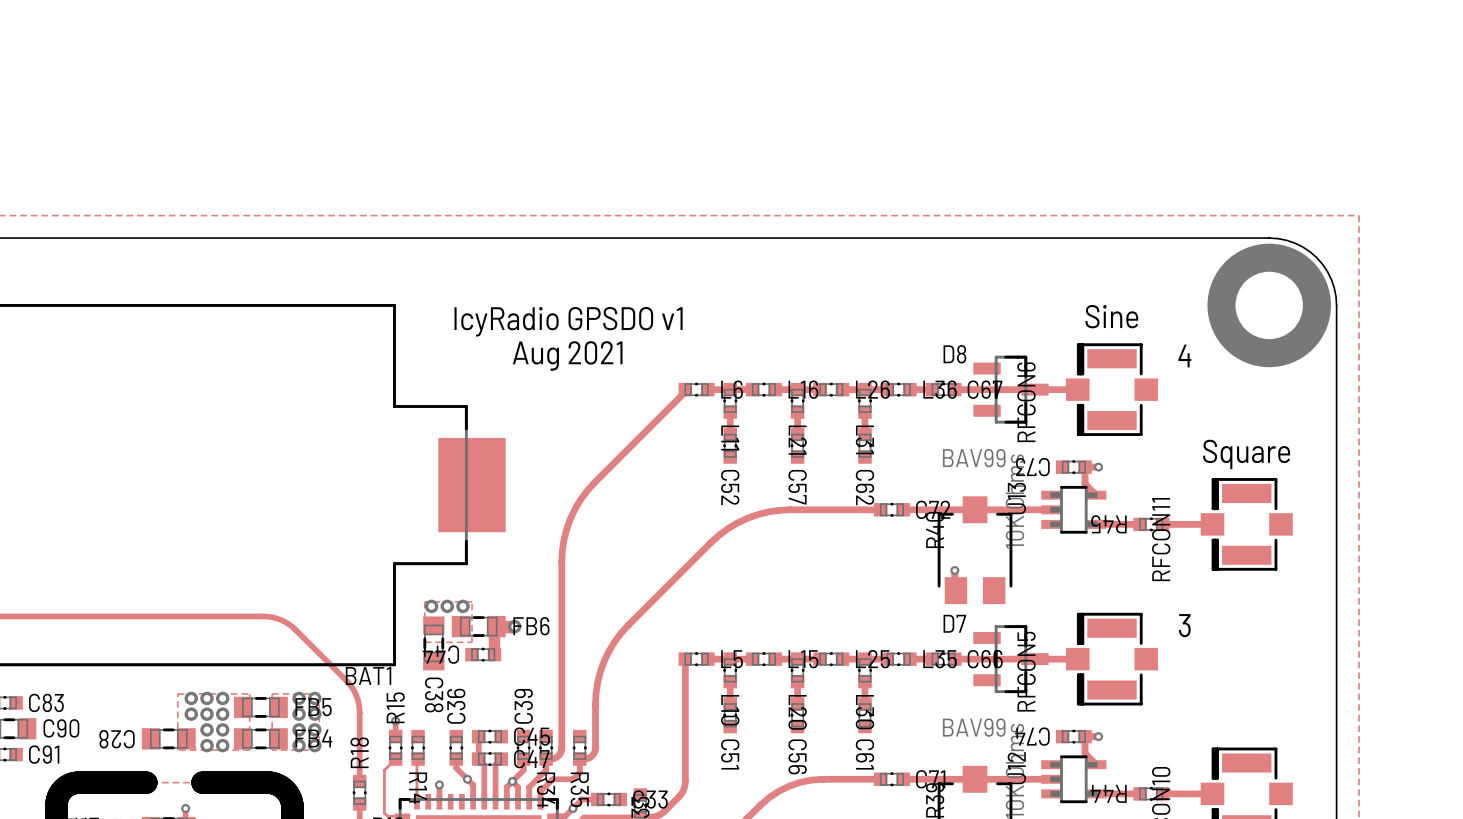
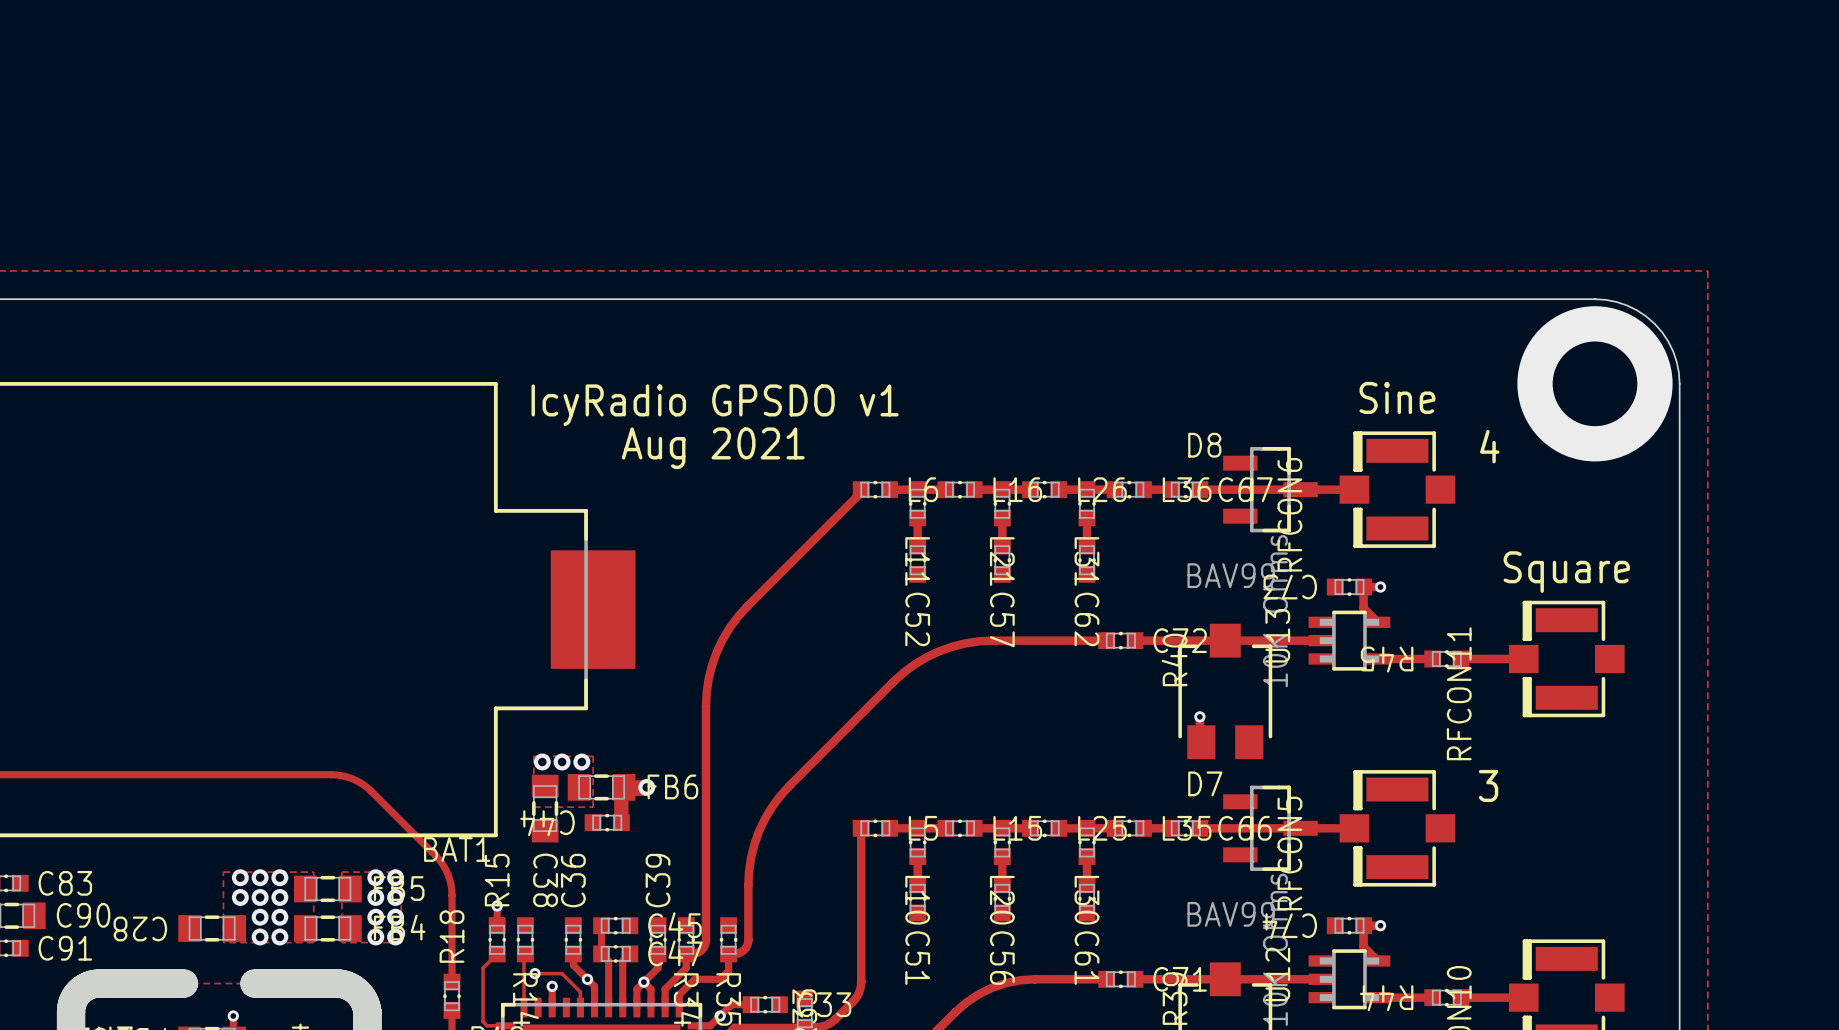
track: none -> (535, 973) (562, 973) (580, 992) (580, 1007)
via: none -> (535, 973)

